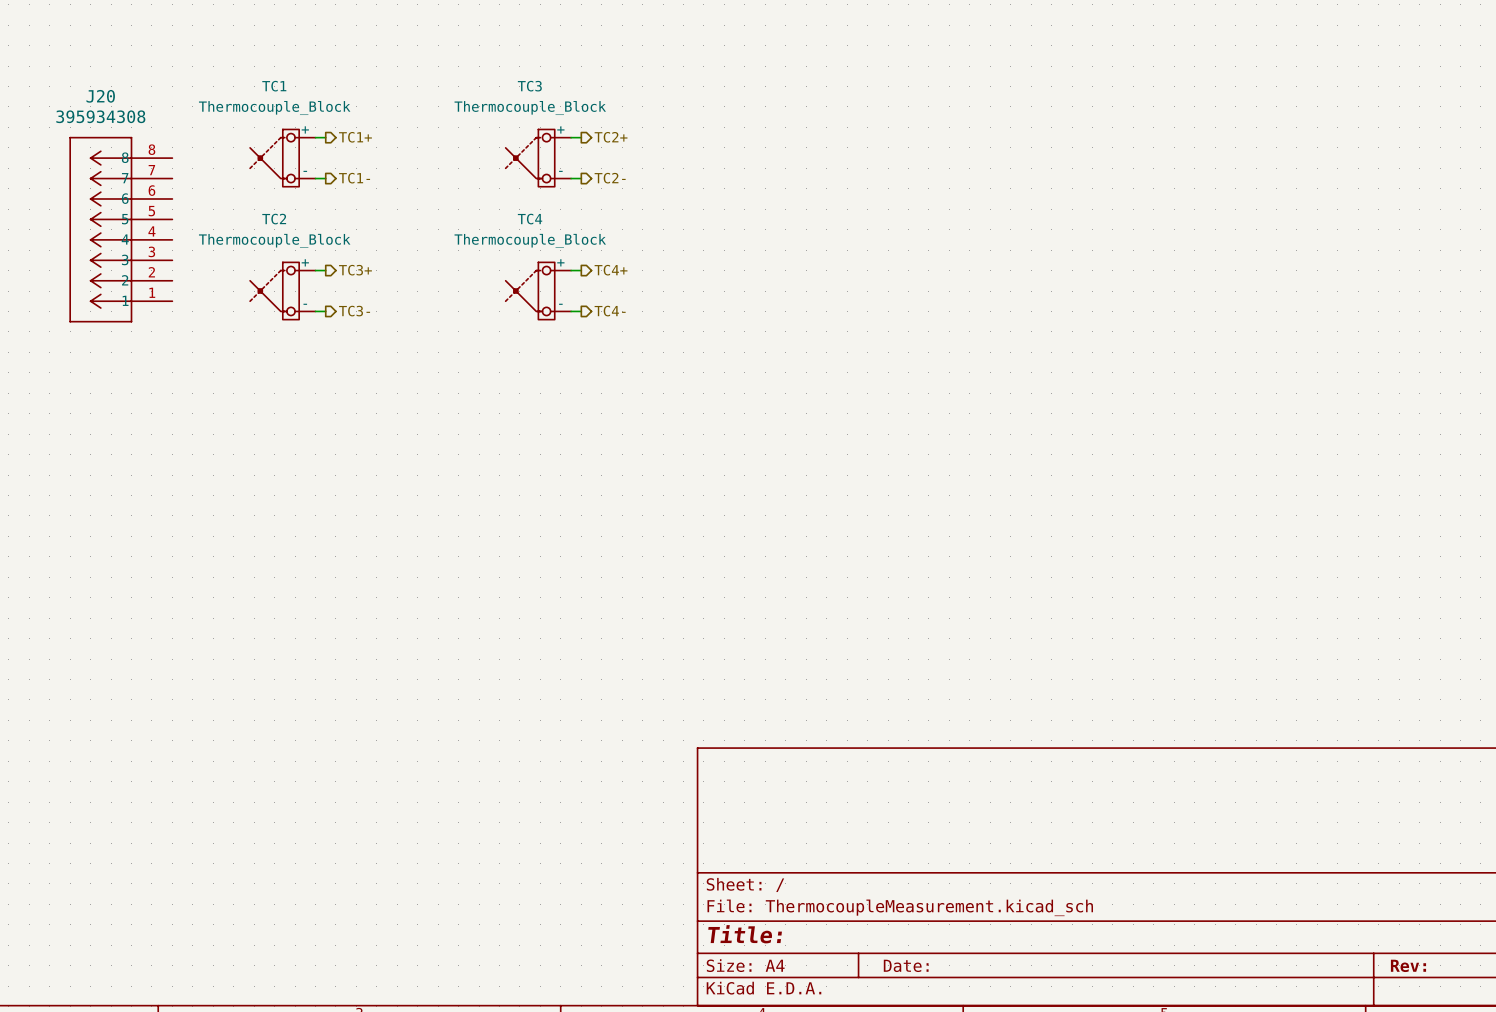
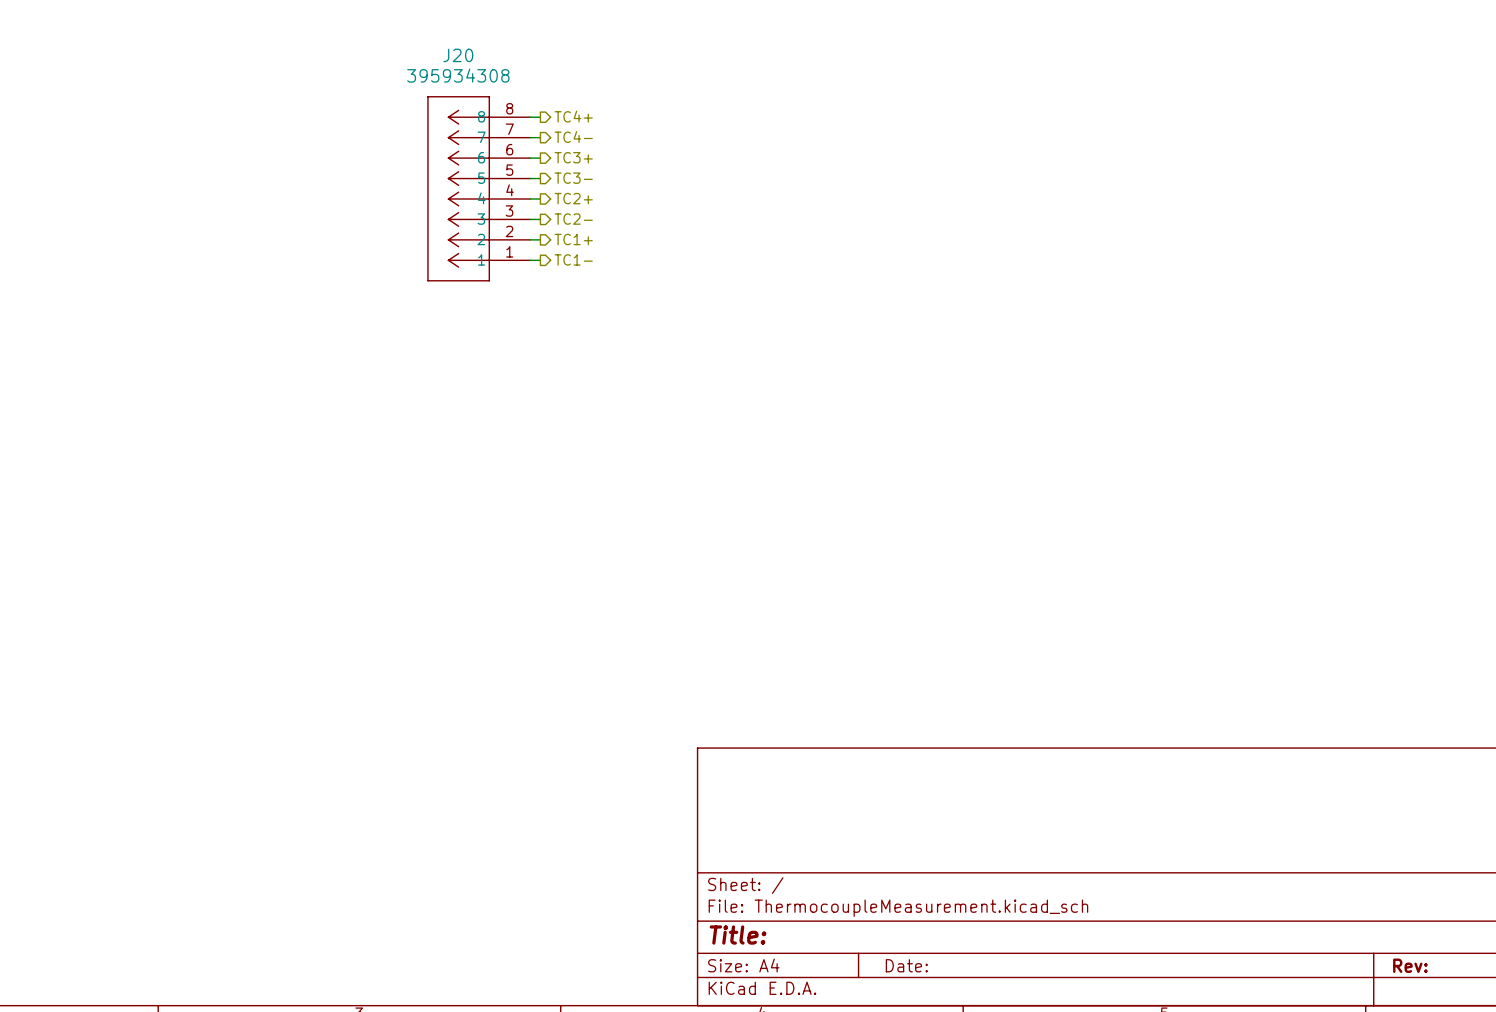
wire: none -> (530, 117) (540, 117)
wire: (315, 137) (325, 137) -> none
hierarchical label: TC1+ (355, 137) -> none
wire: (571, 137) (581, 137) -> (530, 137) (540, 137)
hierarchical label position: TC2+ (611, 137) -> TC2+ (573, 198)
hierarchical label: none -> TC3+ (573, 157)
TC1: Thermocouple_Block (282, 158) -> none
wire: none -> (530, 158) (540, 158)
TC3: Thermocouple_Block (538, 158) -> none
wire: (315, 178) (325, 178) -> none
hierarchical label: TC1- (354, 178) -> none
hierarchical label: none -> TC3- (573, 178)
wire: (571, 178) (581, 178) -> (530, 178) (540, 178)
hierarchical label position: TC2- (610, 178) -> TC2- (573, 219)
wire: none -> (530, 198) (540, 198)
J20 position: (120, 229) -> (478, 188)
wire: none -> (530, 239) (540, 239)
hierarchical label: none -> TC1+ (573, 239)
hierarchical label: none -> TC1- (573, 259)
wire: (315, 270) (325, 270) -> none
hierarchical label: TC3+ (355, 270) -> none
wire: (571, 270) (581, 270) -> (530, 219) (540, 219)
hierarchical label position: TC4+ (611, 270) -> TC4+ (573, 116)
TC2: Thermocouple_Block (282, 291) -> none
TC4: Thermocouple_Block (538, 291) -> none
wire: (315, 311) (325, 311) -> none
hierarchical label: TC3- (354, 311) -> none
wire: (571, 311) (581, 311) -> (530, 260) (540, 260)
hierarchical label position: TC4- (610, 311) -> TC4- (573, 137)

